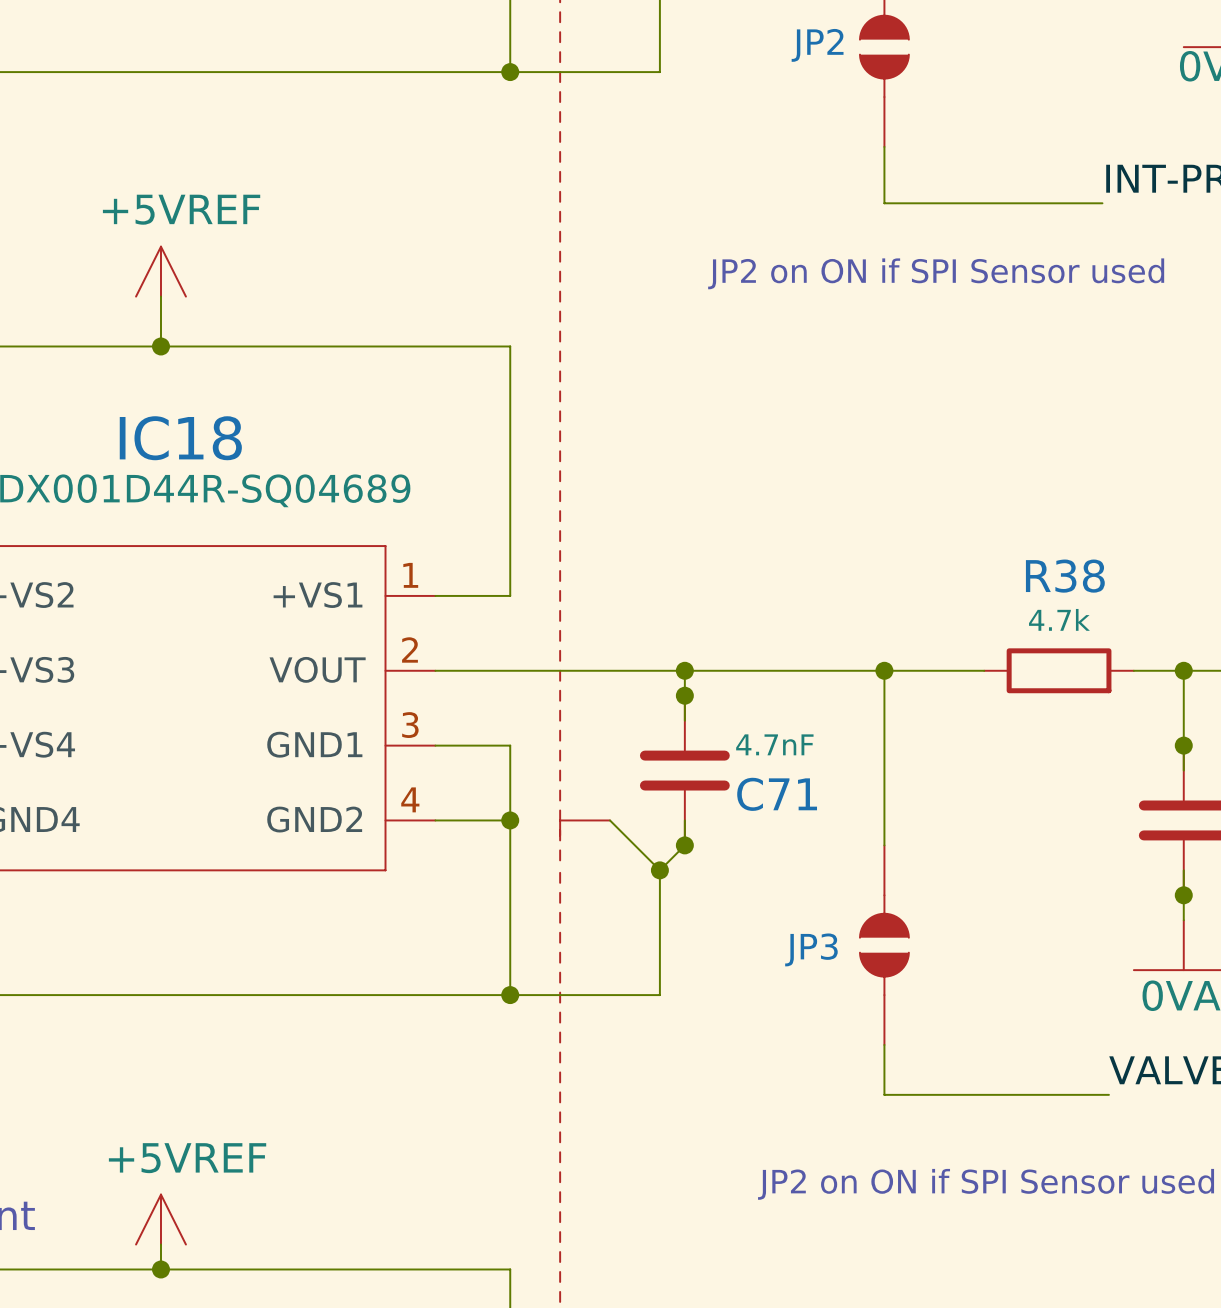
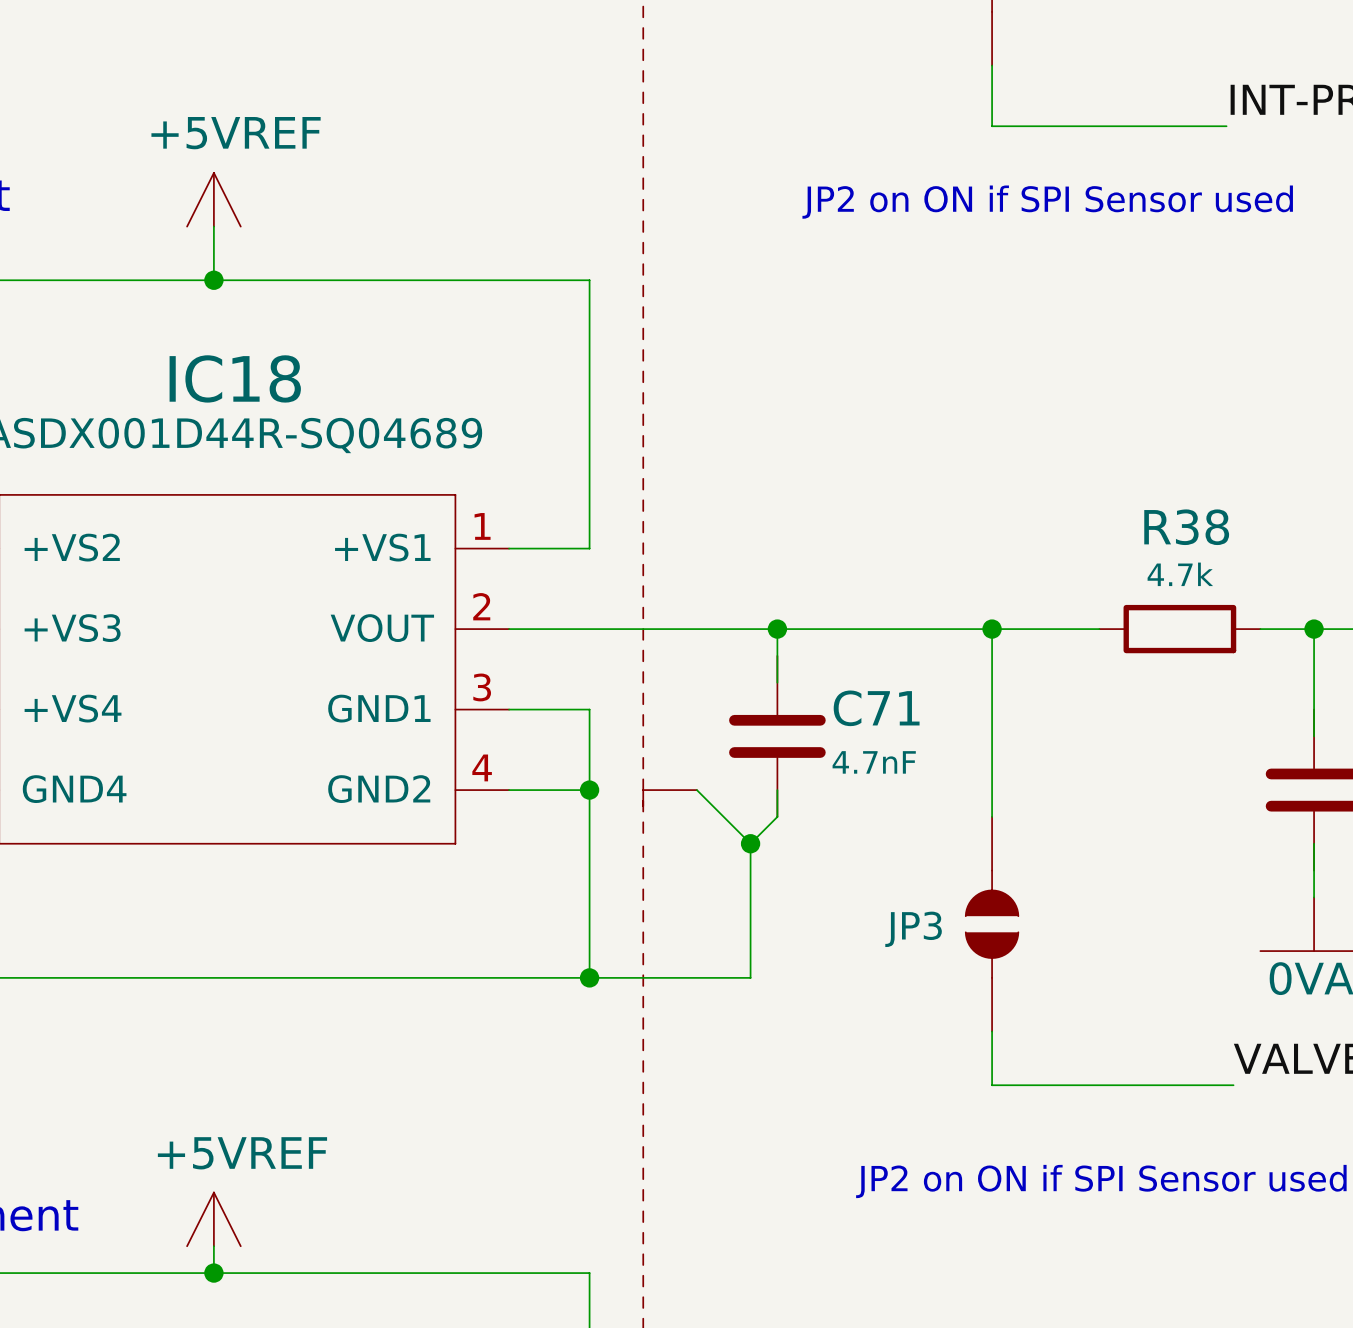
junction: (684, 695) -> none
C71 value position: 4.7nF (774, 744) -> 4.7nF (874, 762)
junction: (1183, 745) -> none
C71 name position: C71 (777, 794) -> C71 (876, 708)
junction: (684, 845) -> none
junction: (1183, 895) -> none

